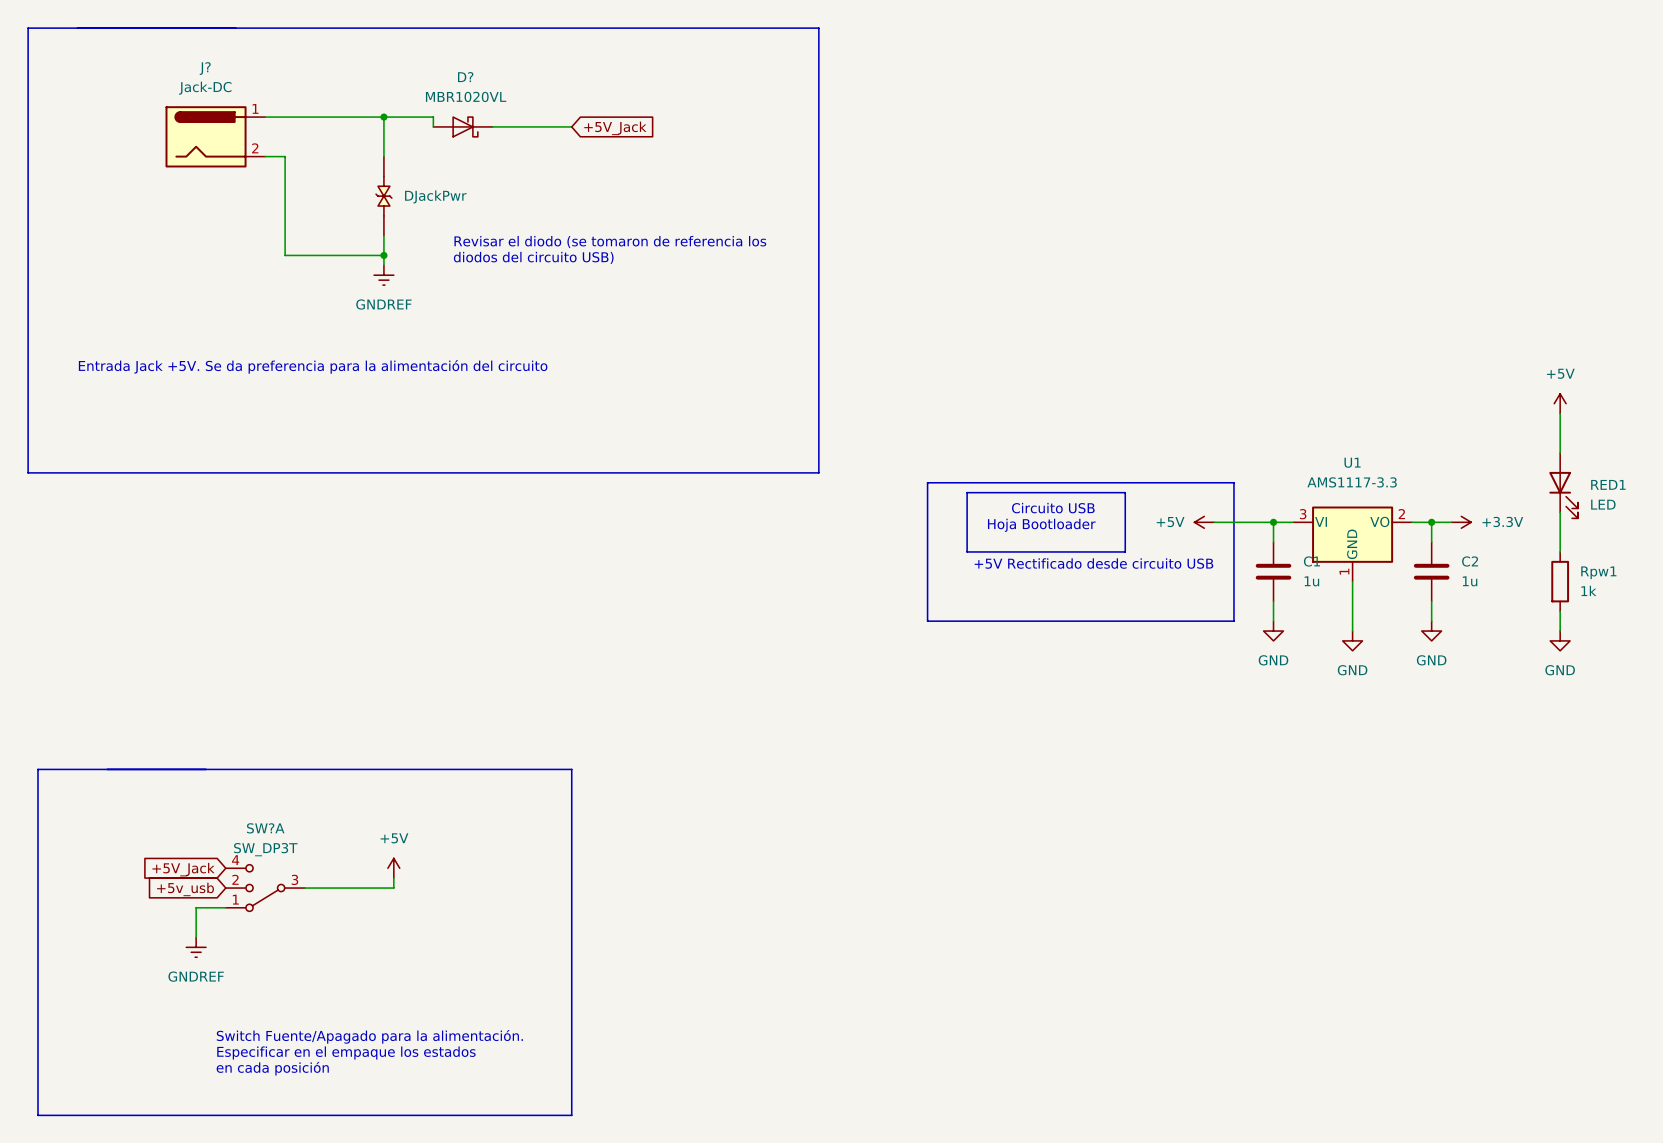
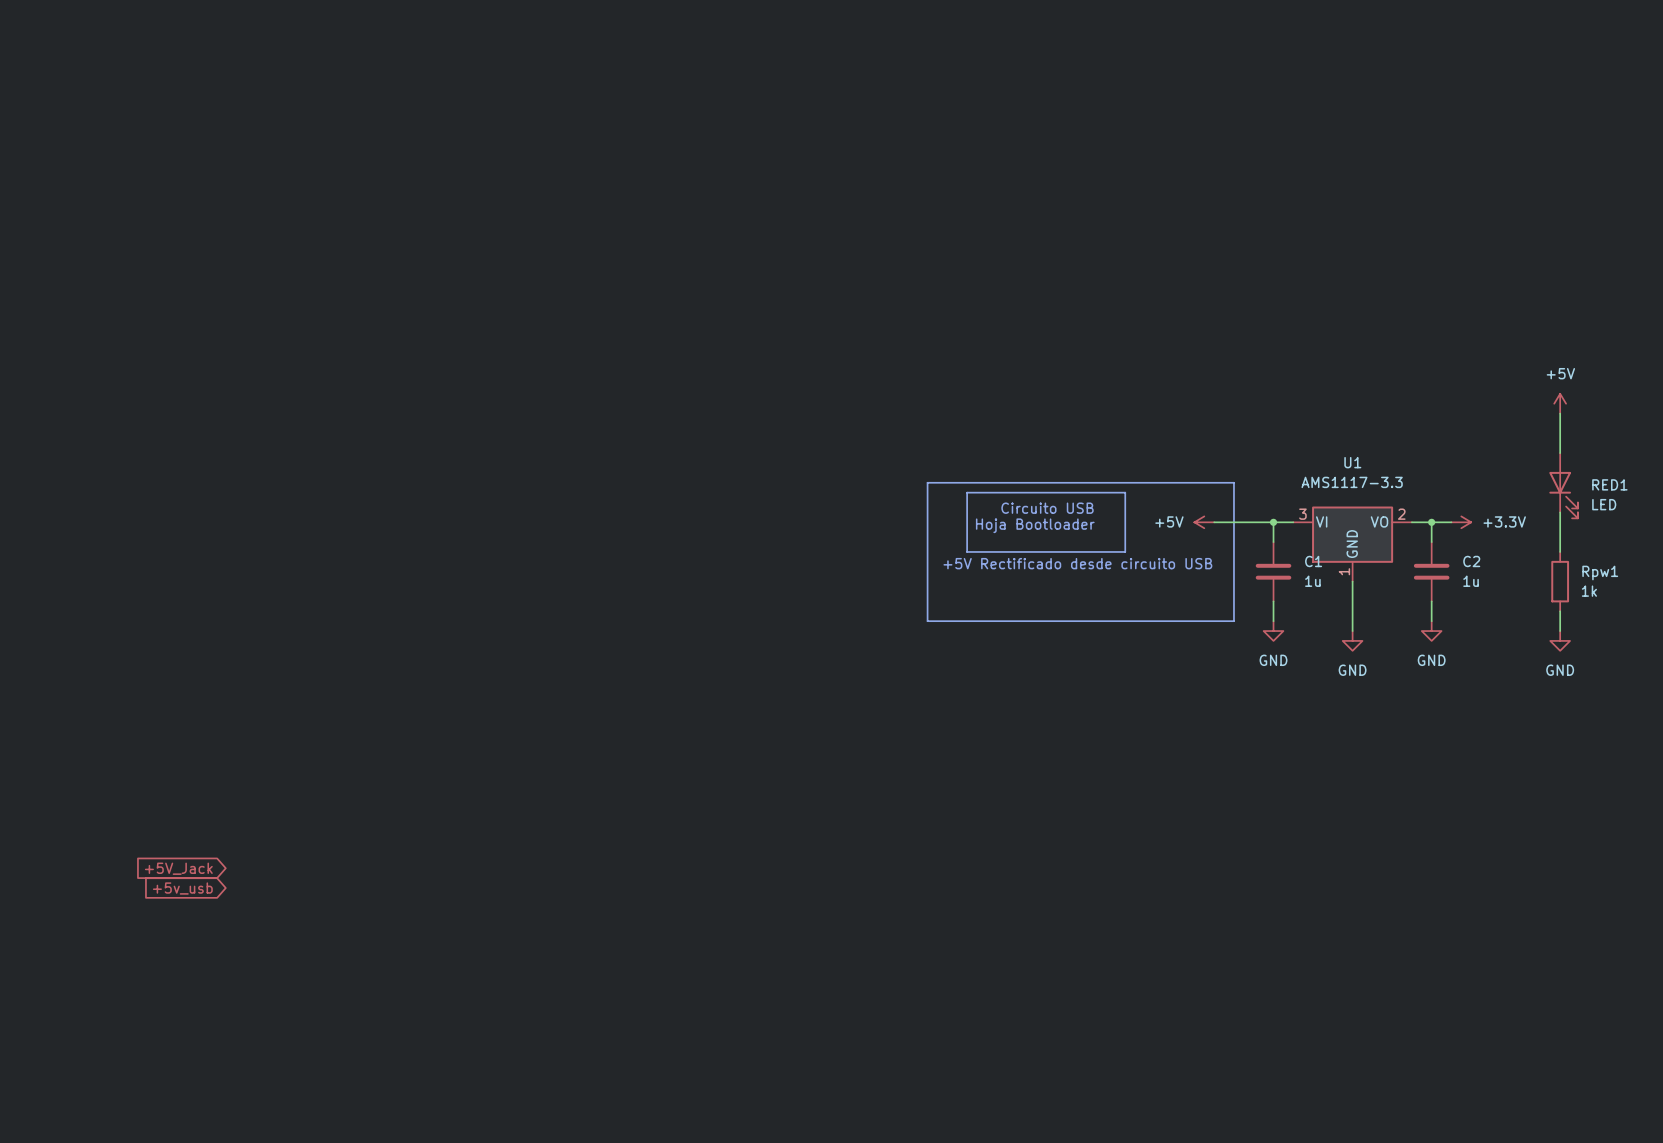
line: (28, 28) (818, 28) (818, 472) (28, 472) (28, 28) -> none
wire: (265, 117) (433, 117) (433, 126) -> none
wire: (383, 117) (383, 156) -> none
junction: (383, 117) -> none
D?: MBR1020VL (463, 126) -> none
wire: (492, 126) (571, 126) -> none
global label: +5V_Jack (615, 128) -> none
J?: Jack-DC (215, 136) -> none
wire: (265, 156) (285, 156) (285, 255) (383, 255) -> none
DJackPwr: (383, 196) -> none
wire: (383, 235) (383, 265) -> none
text: Revisar el diodo (se tomaron de referencia los (610, 242) -> none
junction: (383, 255) -> none
text: diodos del circuito USB) (533, 257) -> none
power symbol: GNDREF (383, 275) -> none
text: Entrada Jack +5V. Se da preferencia para la alimentación del circuito (313, 366) -> none
line: (37, 769) (571, 769) (571, 1115) (37, 1115) (37, 769) -> none
power symbol: +5V (393, 868) -> none
wire: (393, 878) (393, 888) (304, 888) -> none
SW?A: SW_DP3T (265, 888) -> none
wire: (225, 907) (196, 907) (196, 937) -> none
power symbol: GNDREF (196, 947) -> none
text: Switch Fuente/Apagado para la alimentación. (369, 1036) -> none
text: Especificar en el empaque los estados (346, 1053) -> none
text: en cada posición (272, 1068) -> none

